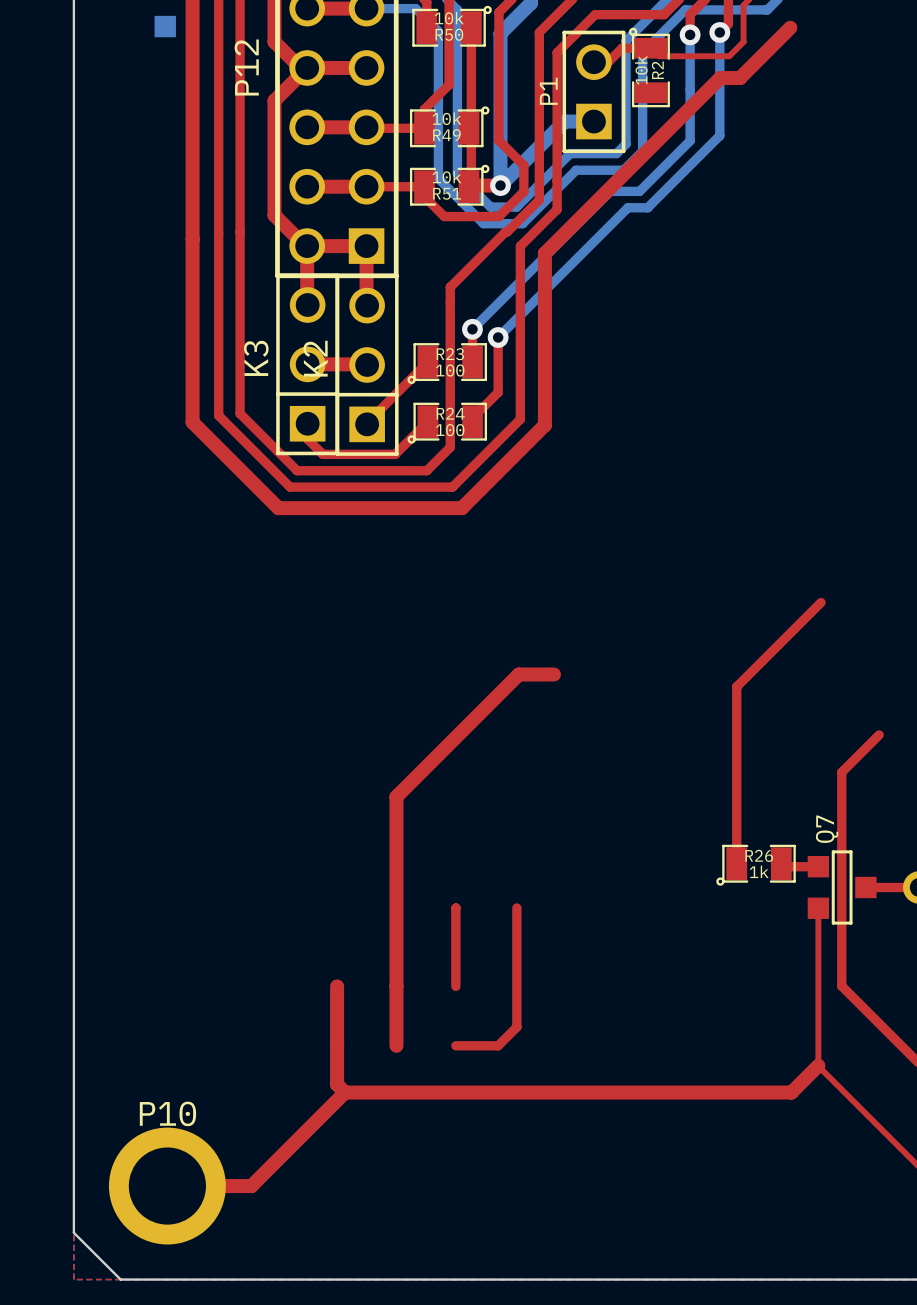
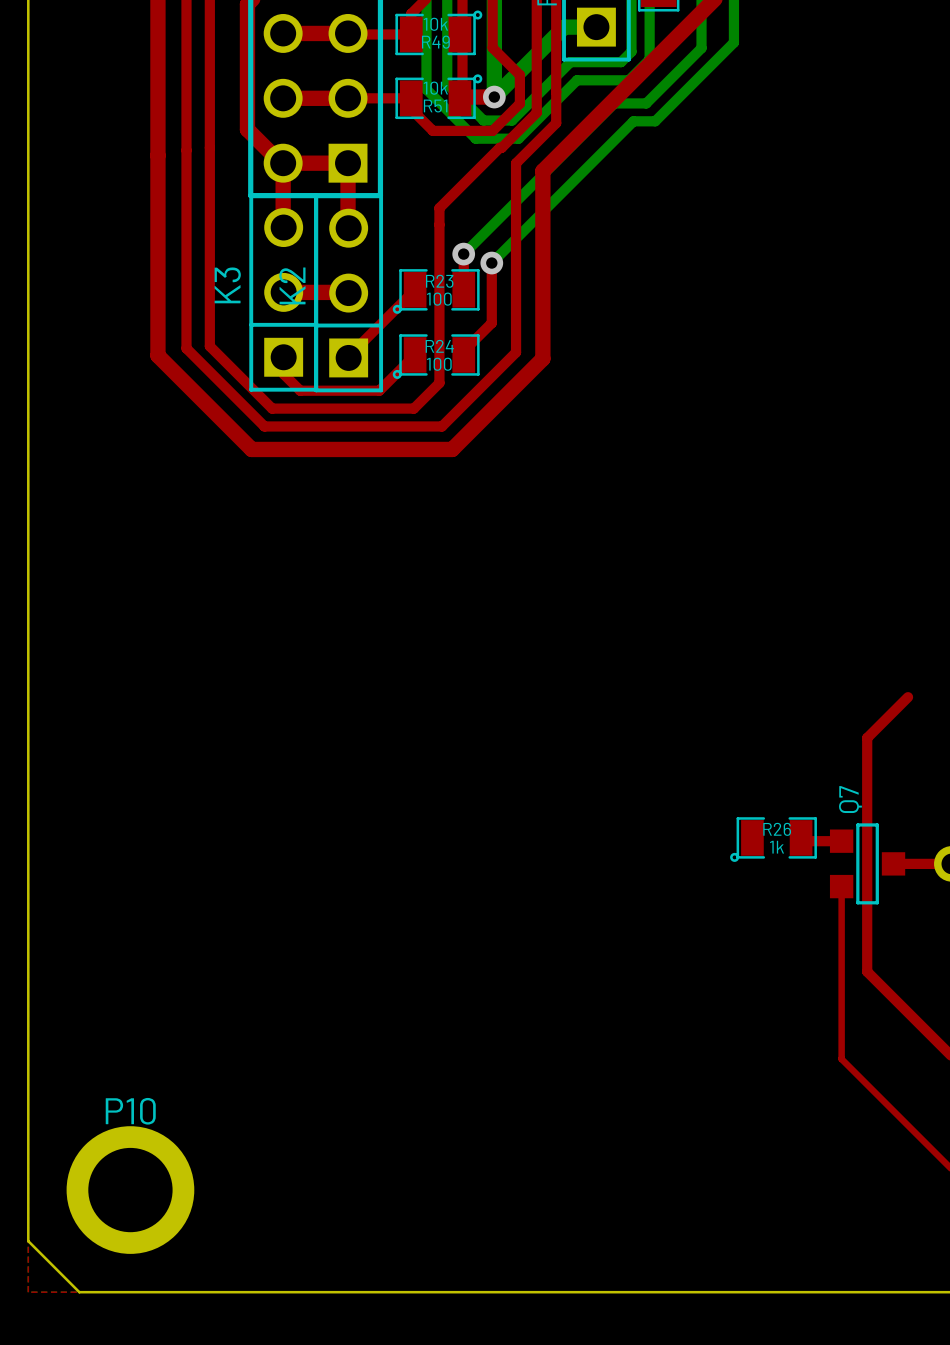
top track: (821, 602) (736, 686) (736, 863) -> none
top track: (553, 674) (518, 674) (396, 796) (396, 1045) -> none
top track: (516, 907) (516, 1027) (498, 1045) (455, 1045) -> none
top track: (455, 908) (455, 986) -> none
top track: (337, 986) (337, 1084) (345, 1092) -> none
top track: (818, 1065) (791, 1092) (345, 1092) -> none
top track: (345, 1092) (251, 1186) (167, 1186) -> none

